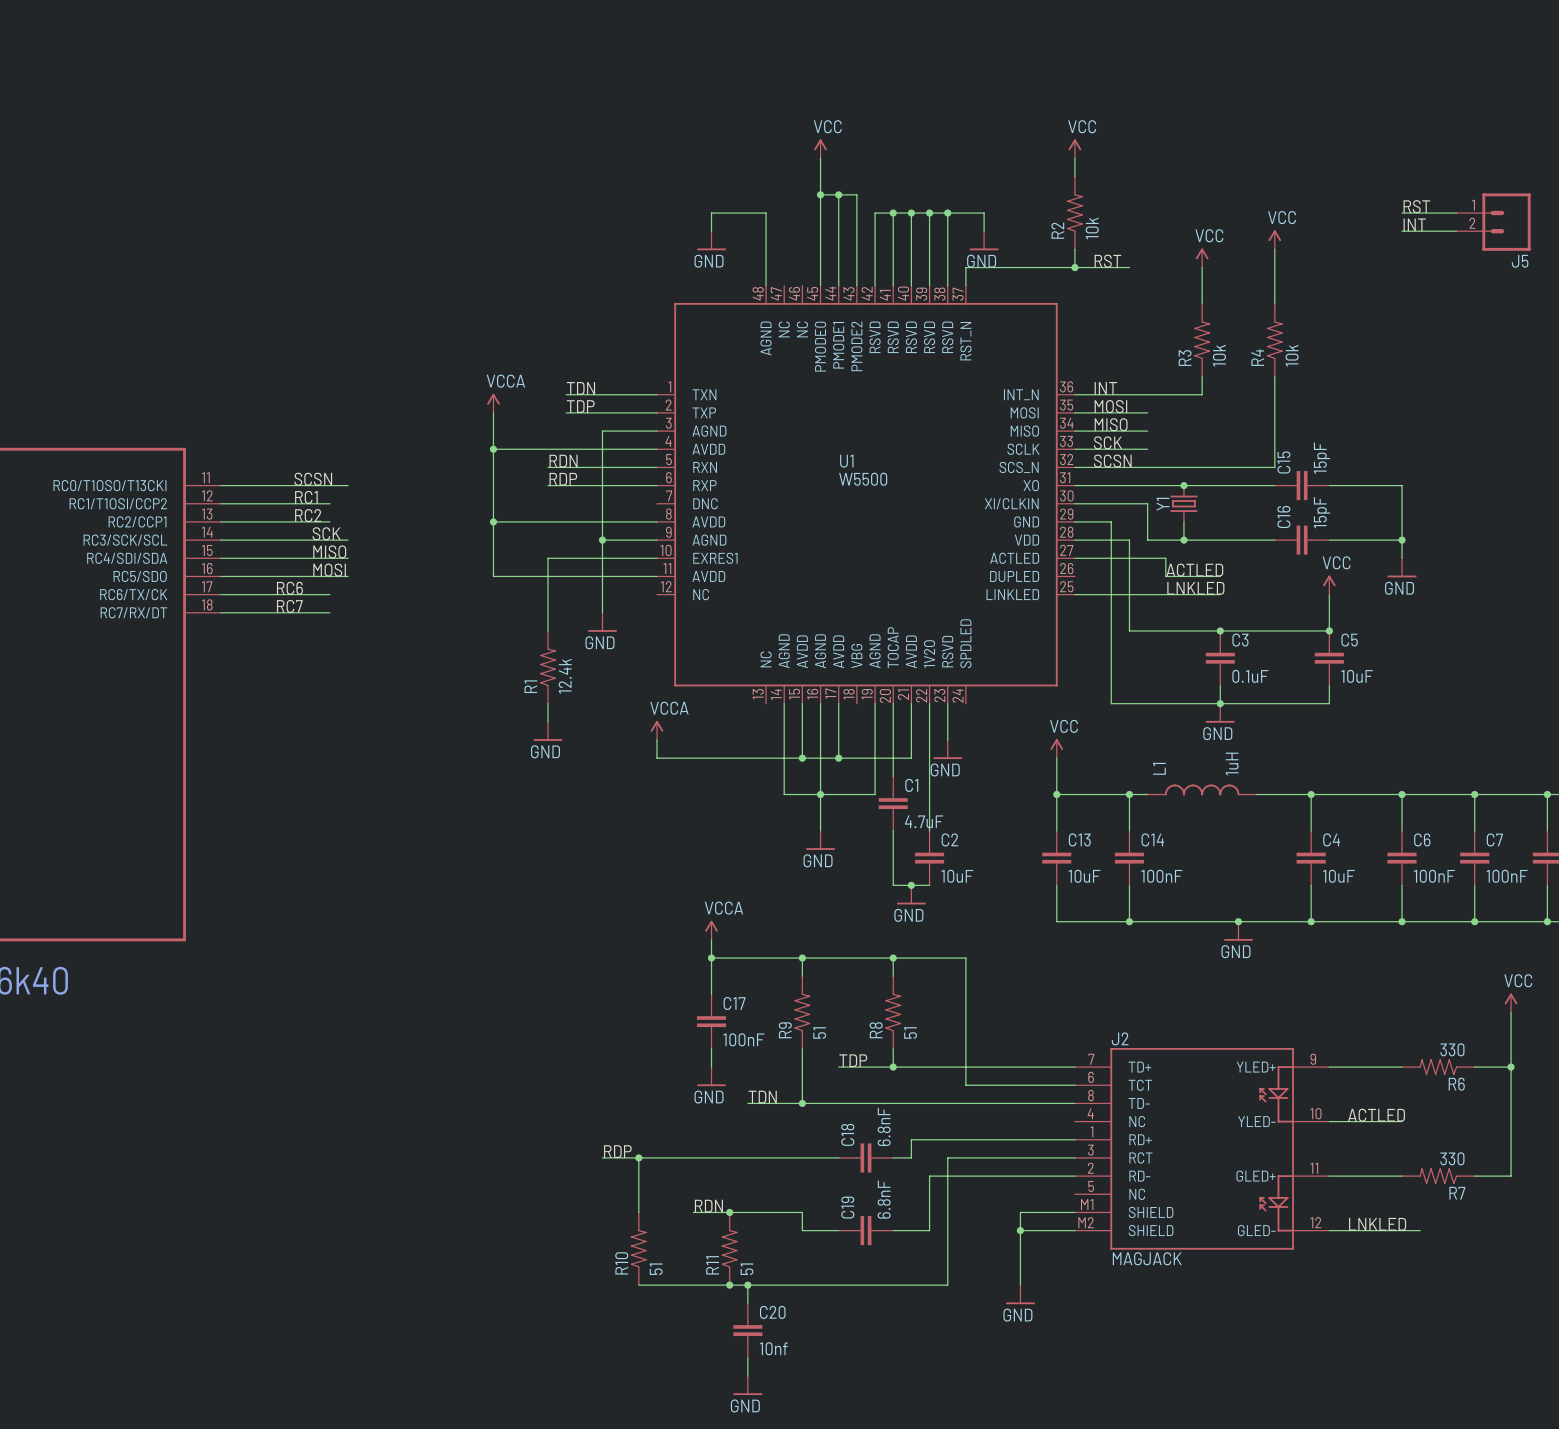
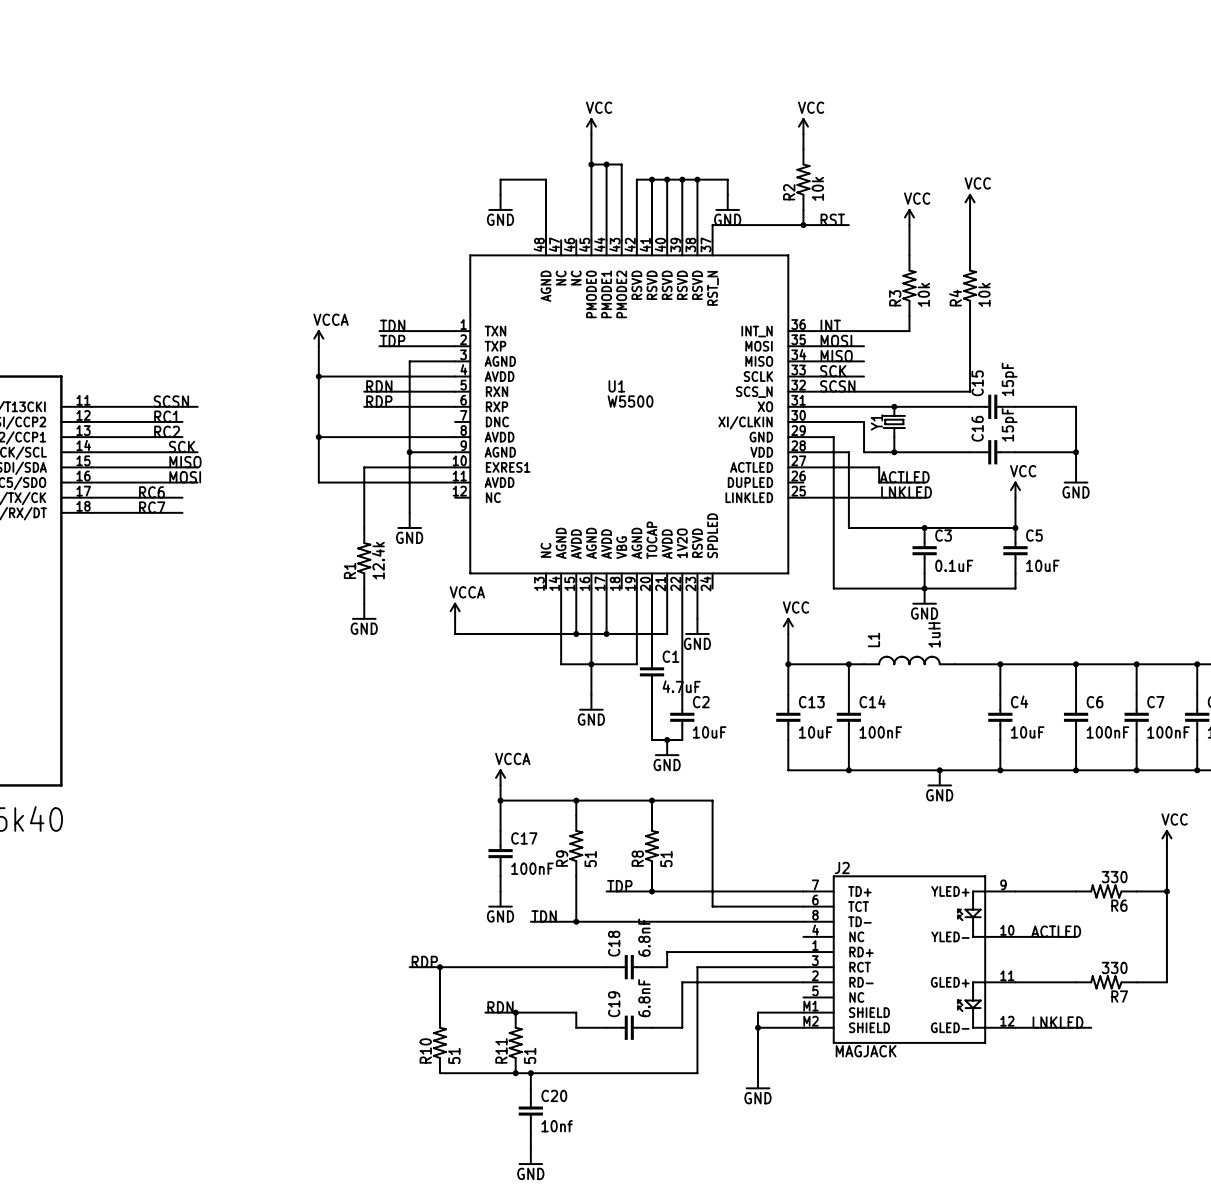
label: RST (1416, 206) -> none
wire: (1402, 213) (1456, 213) -> none
J5: (1493, 222) -> none
label: INT (1414, 224) -> none
wire: (1402, 231) (1456, 231) -> none

